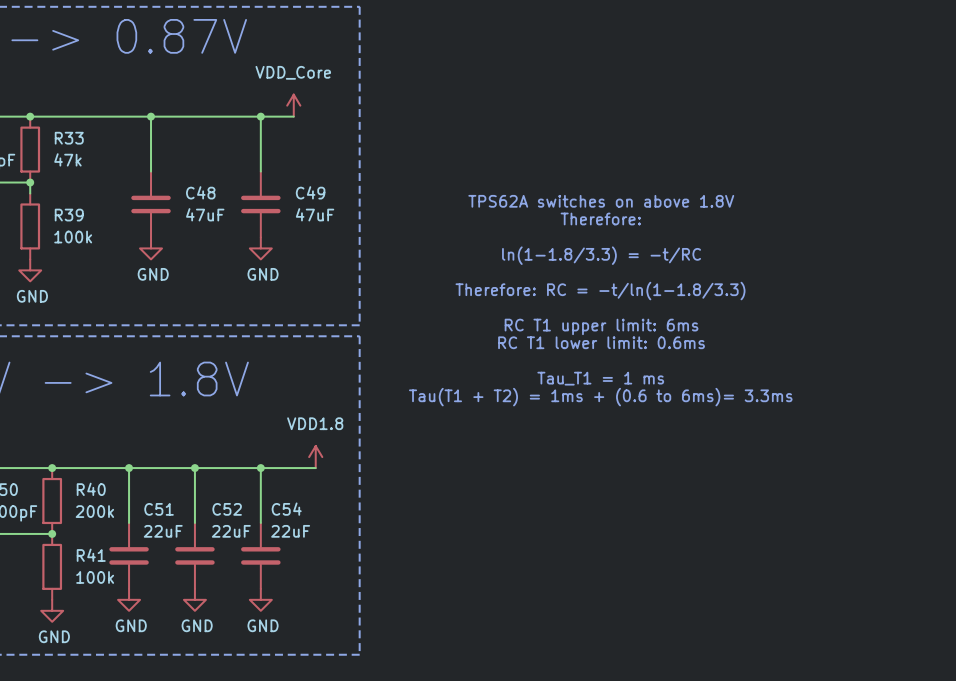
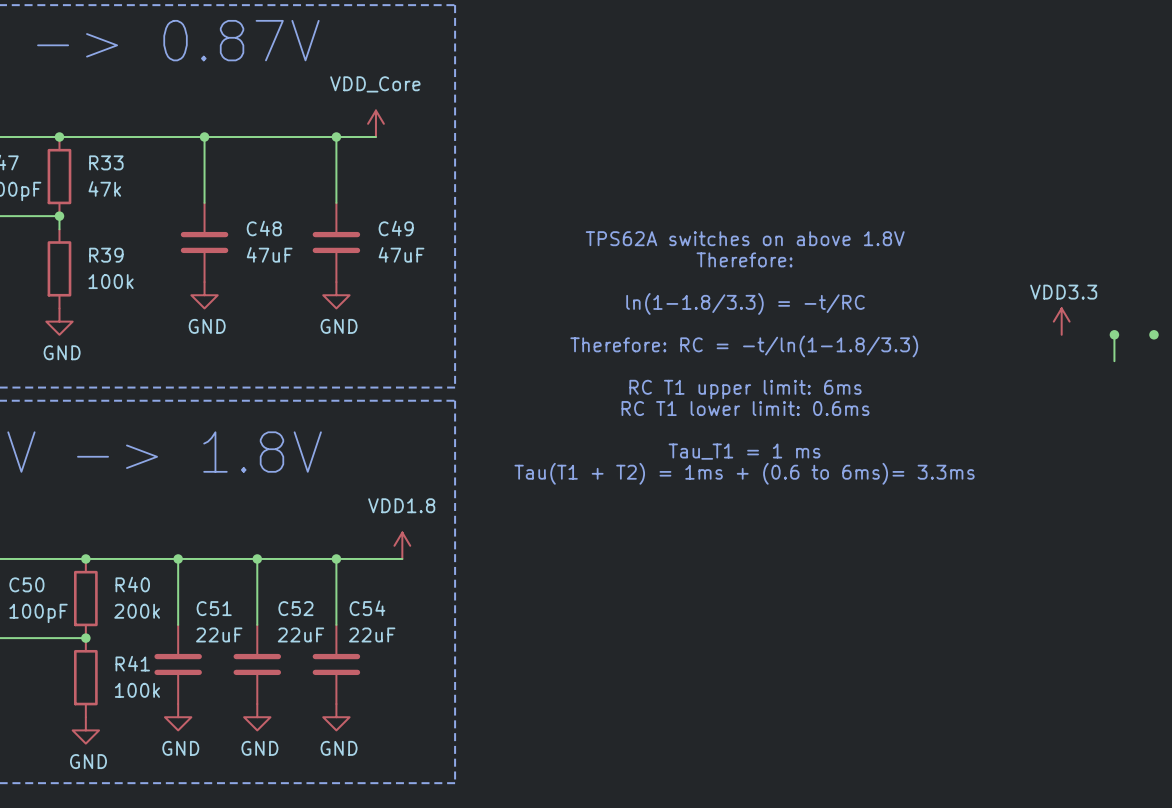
power symbol: none -> VDD3.3 (1061, 321)
wire: none -> (1114, 334) (1114, 361)
junction: none -> (1114, 334)
junction: none -> (1153, 334)

